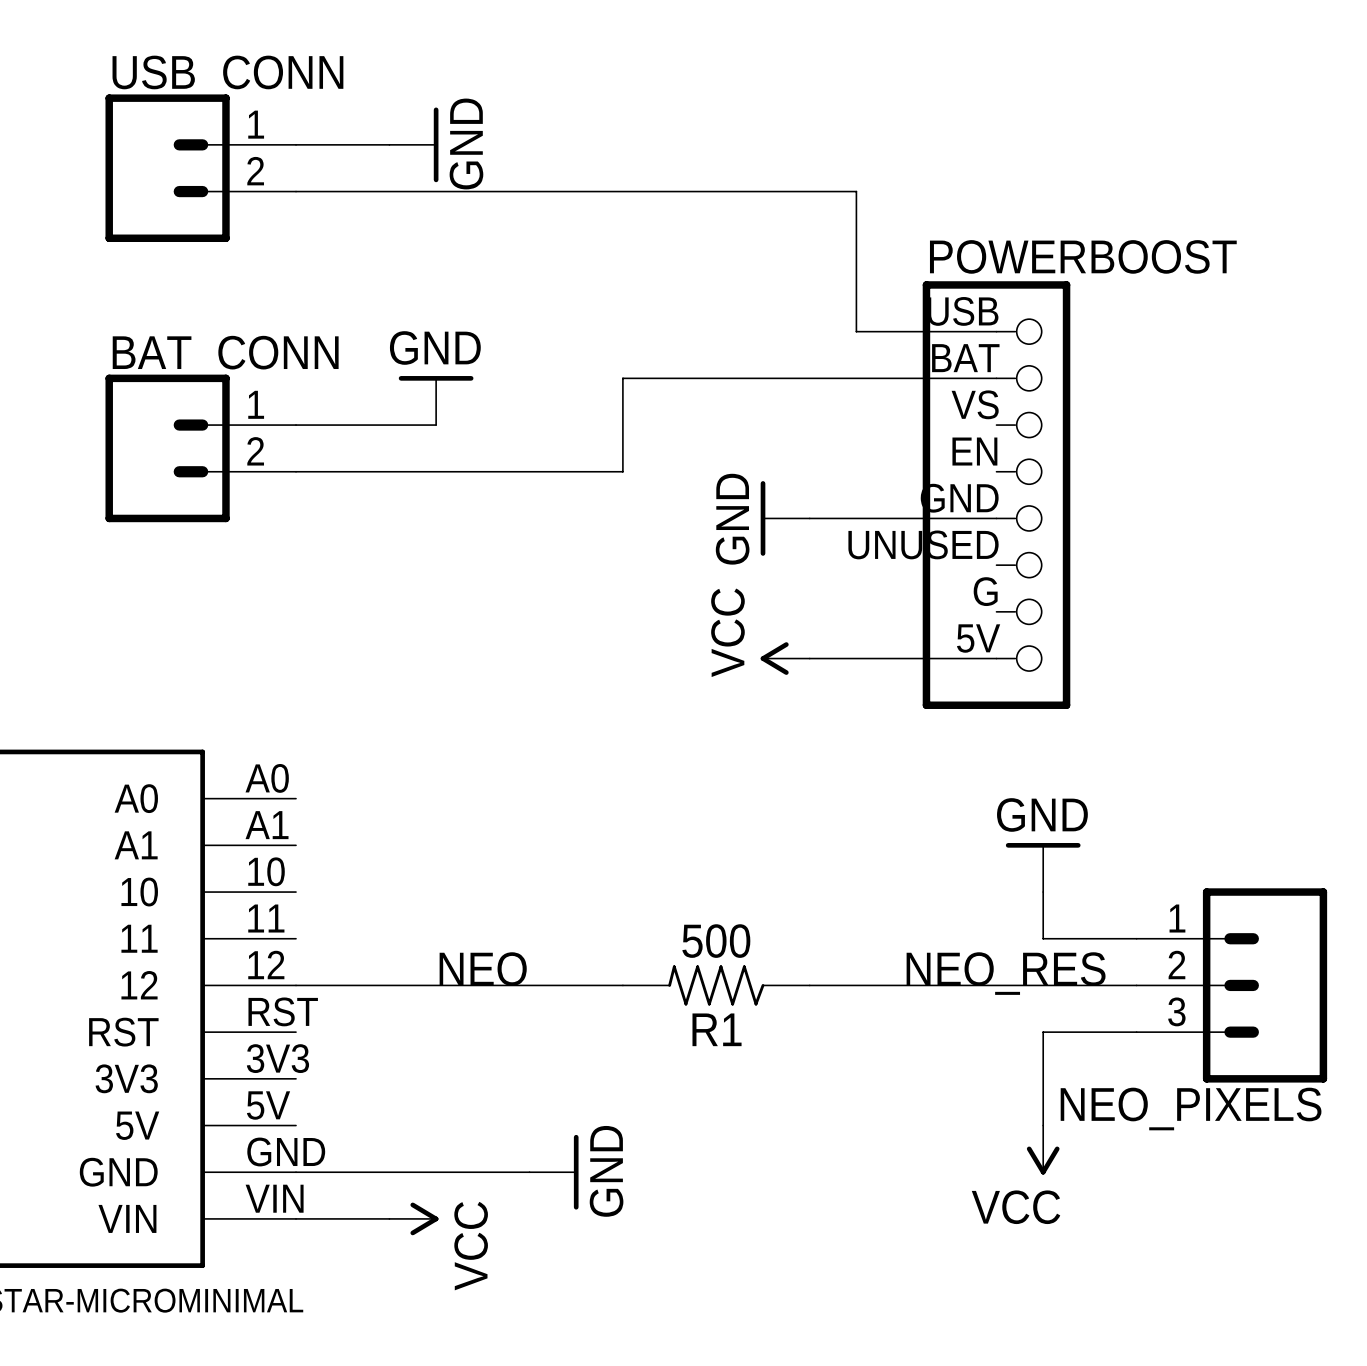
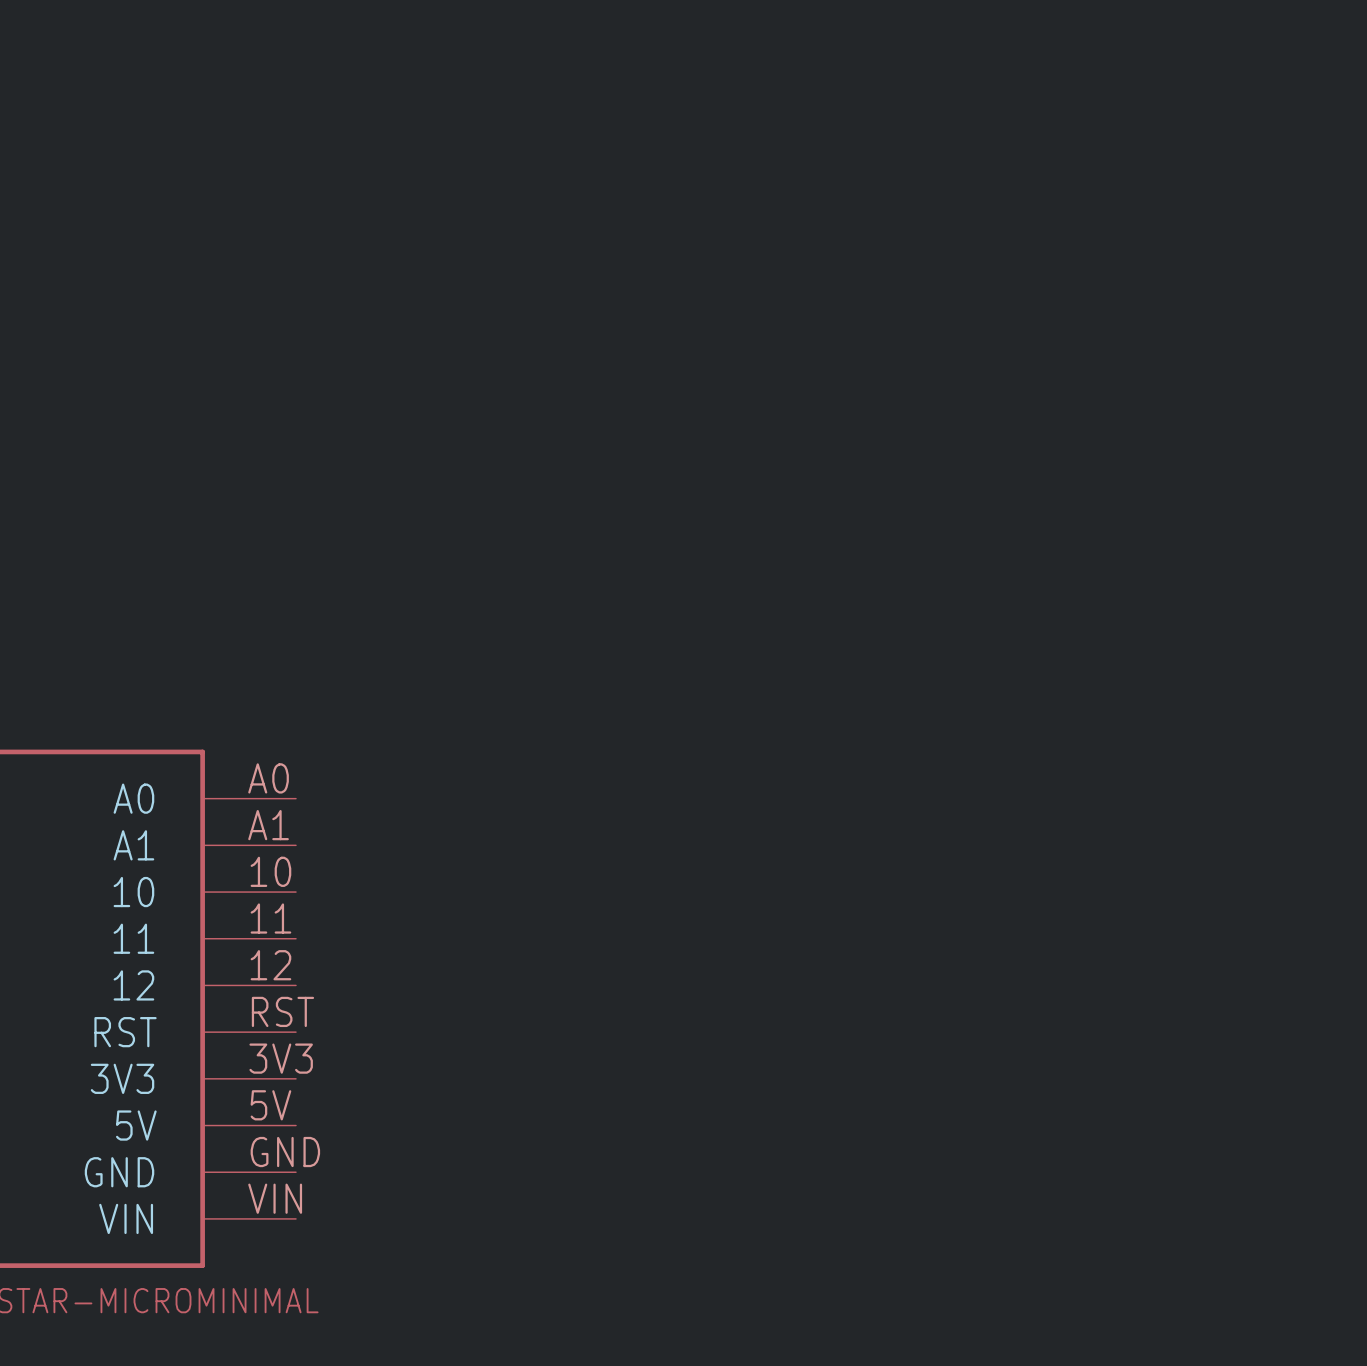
wire: (296, 144) (389, 144) -> none
power symbol: GND (413, 144) -> none
USB_CONN: (200, 168) -> none
wire: (296, 191) (856, 191) (856, 331) (996, 331) -> none
wire: (996, 378) (622, 378) (622, 471) (296, 471) -> none
power symbol: GND (436, 400) -> none
wire: (296, 425) (436, 425) -> none
BAT_CONN: (200, 448) -> none
POWERBOOST: (996, 495) -> none
power symbol: GND (785, 518) -> none
wire: (809, 518) (996, 518) -> none
power symbol: VCC (785, 658) -> none
wire: (809, 658) (996, 658) -> none
power symbol: GND (1043, 867) -> none
wire: (1043, 892) (1043, 938) (1136, 938) -> none
label: NEO (483, 969) -> none
label: NEO_RES (1006, 973) -> none
wire: (296, 985) (622, 985) -> none
R1: 500 (716, 985) -> none
wire: (809, 985) (1136, 985) -> none
NEO_PIXELS: (1231, 985) -> none
wire: (1136, 1032) (1043, 1032) (1043, 1125) -> none
power symbol: VCC (1043, 1150) -> none
wire: (296, 1172) (529, 1172) -> none
power symbol: GND (554, 1172) -> none
wire: (296, 1218) (389, 1218) -> none
power symbol: VCC (413, 1218) -> none

